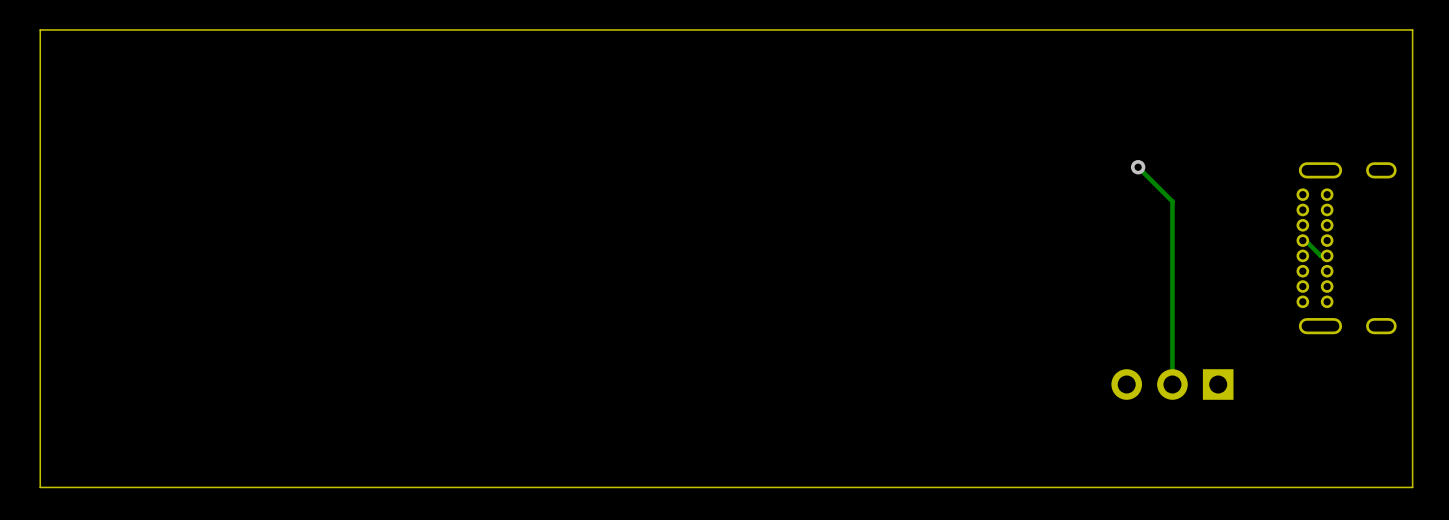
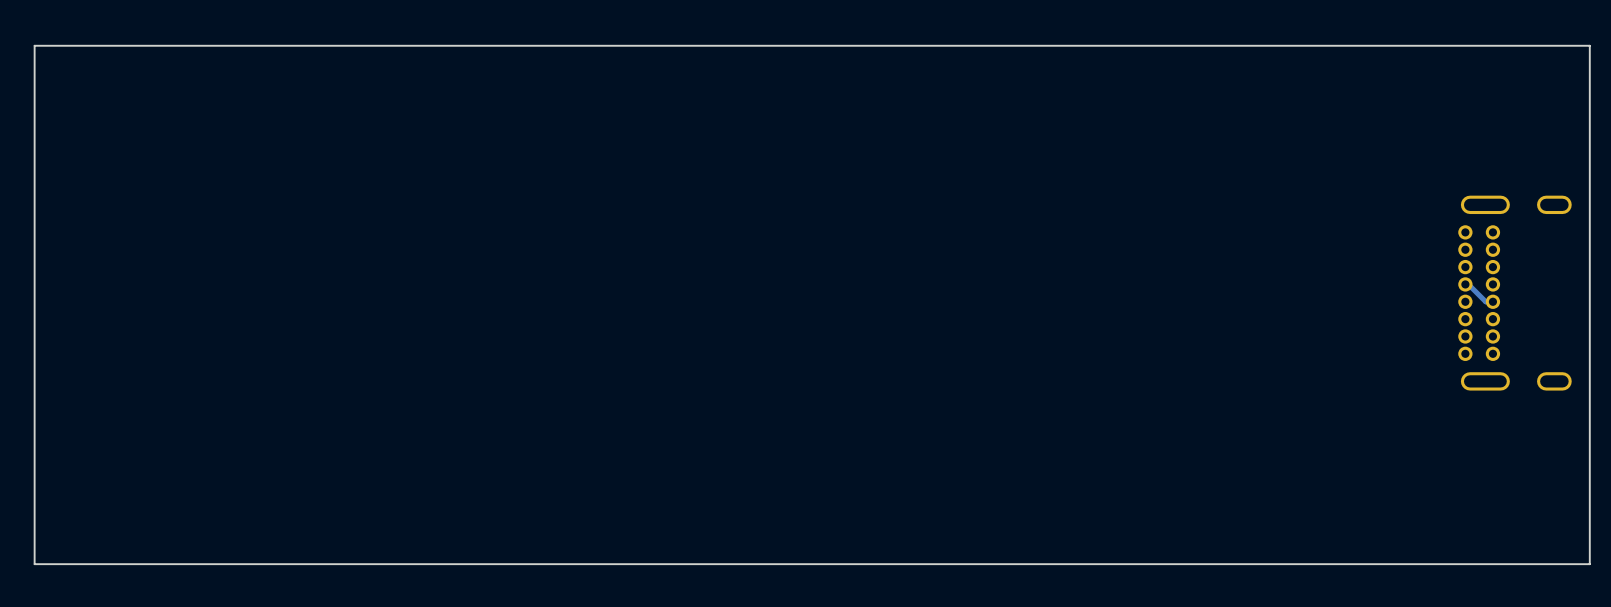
track: (1138, 167) (1172, 201) (1172, 384) -> none
via: (1138, 167) -> none
part: (1172, 384) -> none

